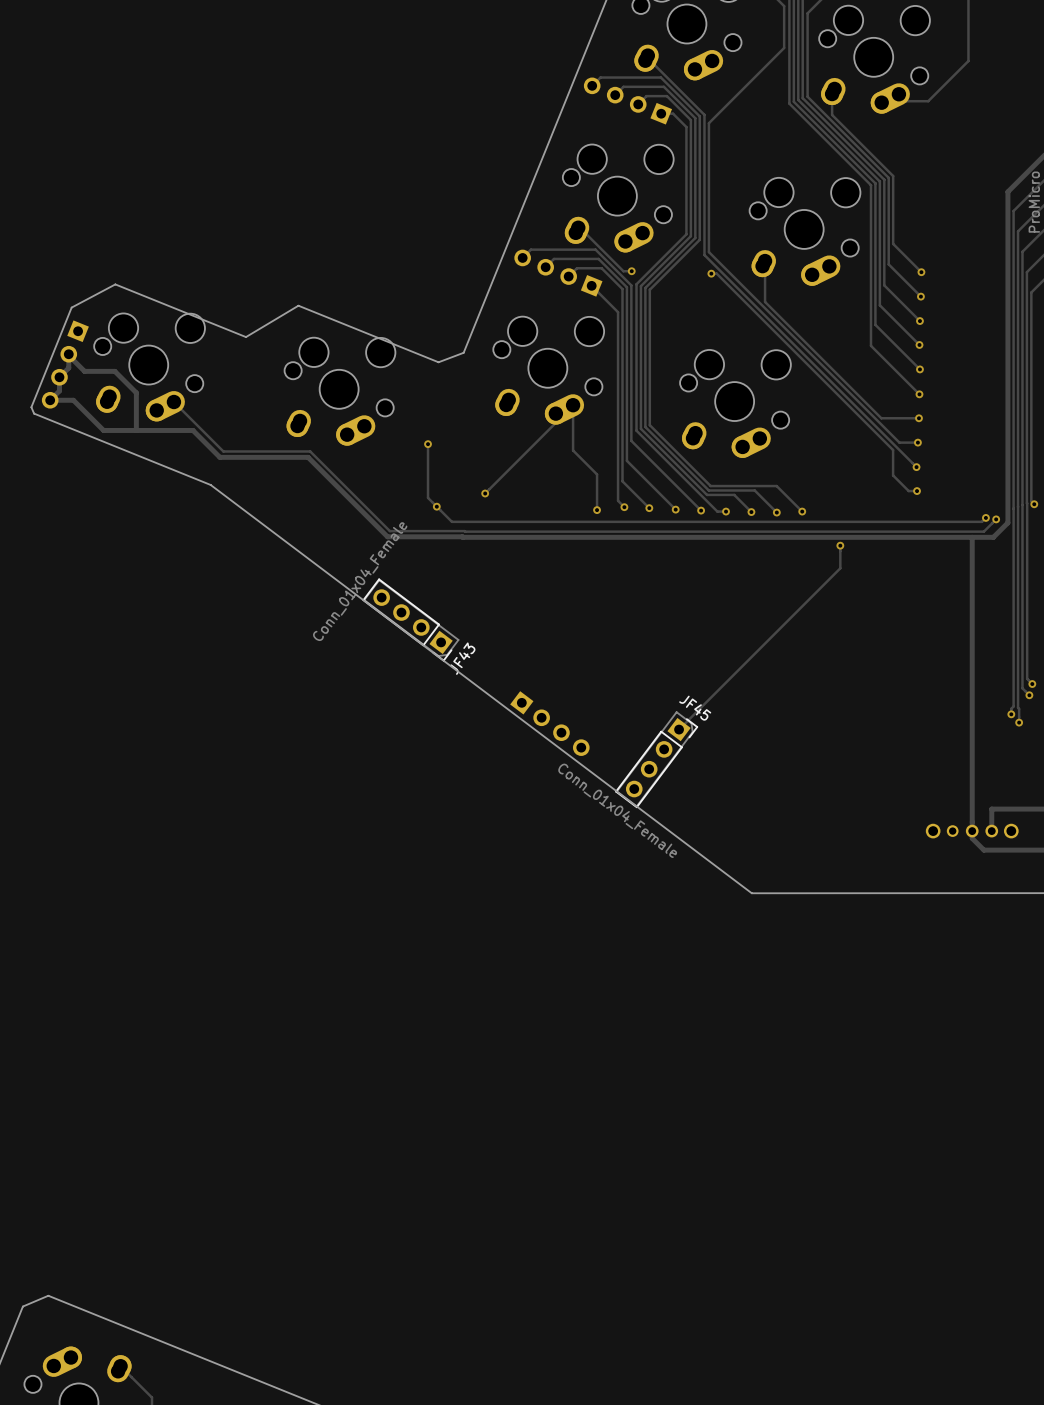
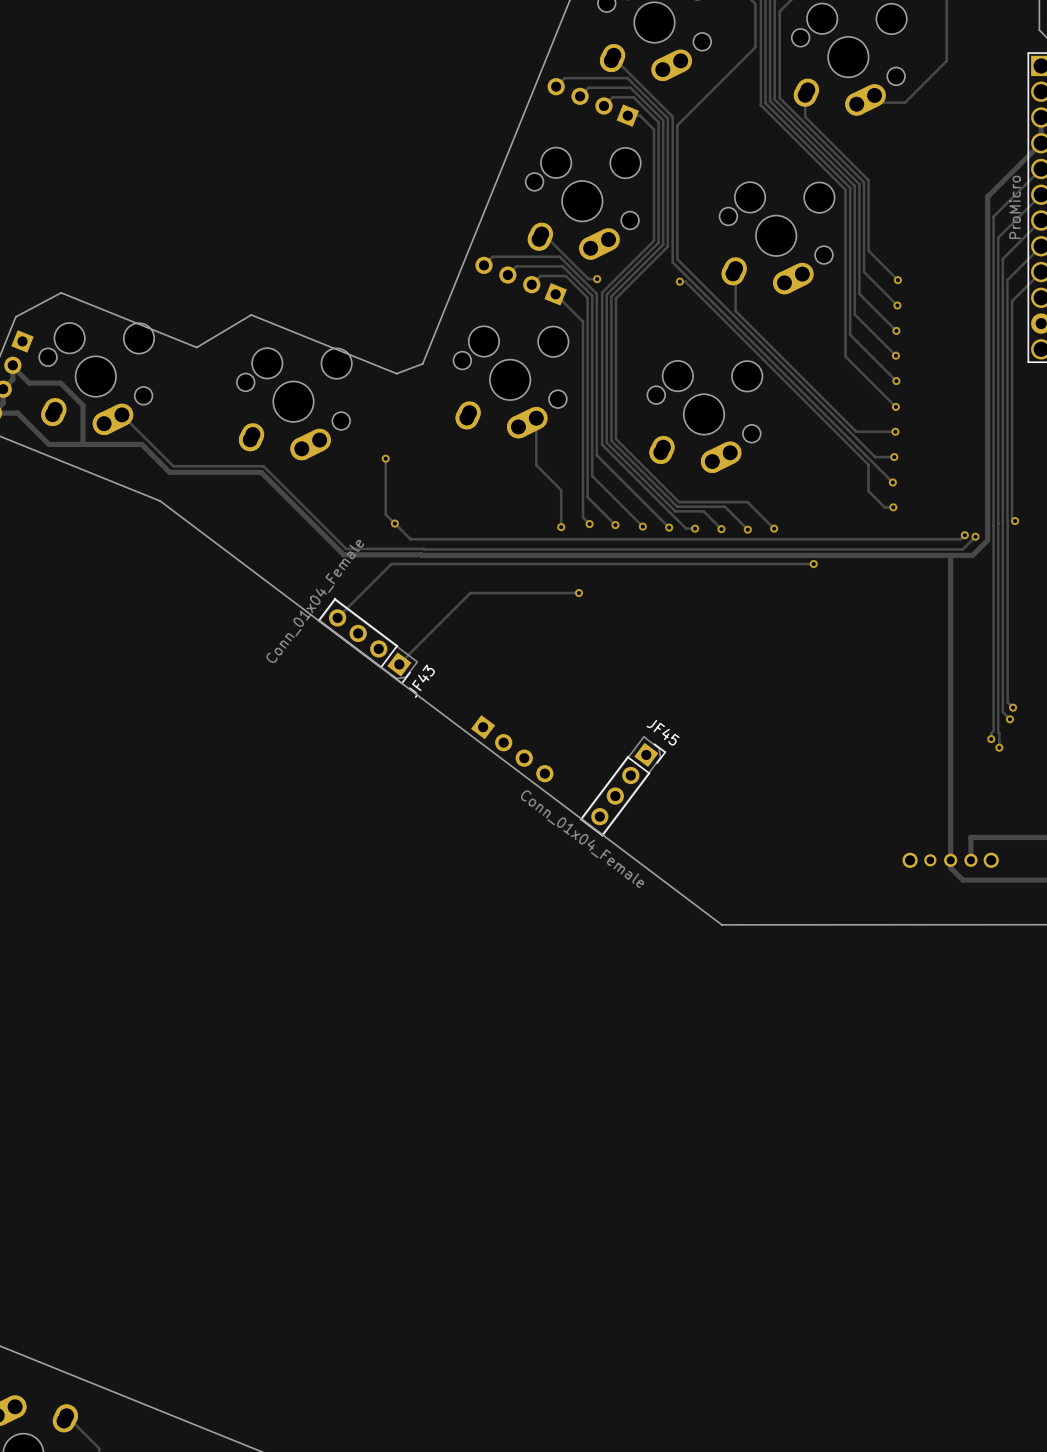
track: (573, 405) (485, 493) -> none
via: (485, 493) -> none
track: (840, 545) (840, 568) (679, 729) -> (813, 564) (391, 564) (337, 617)
track: none -> (578, 593) (470, 593) (399, 664)
via: none -> (578, 593)

